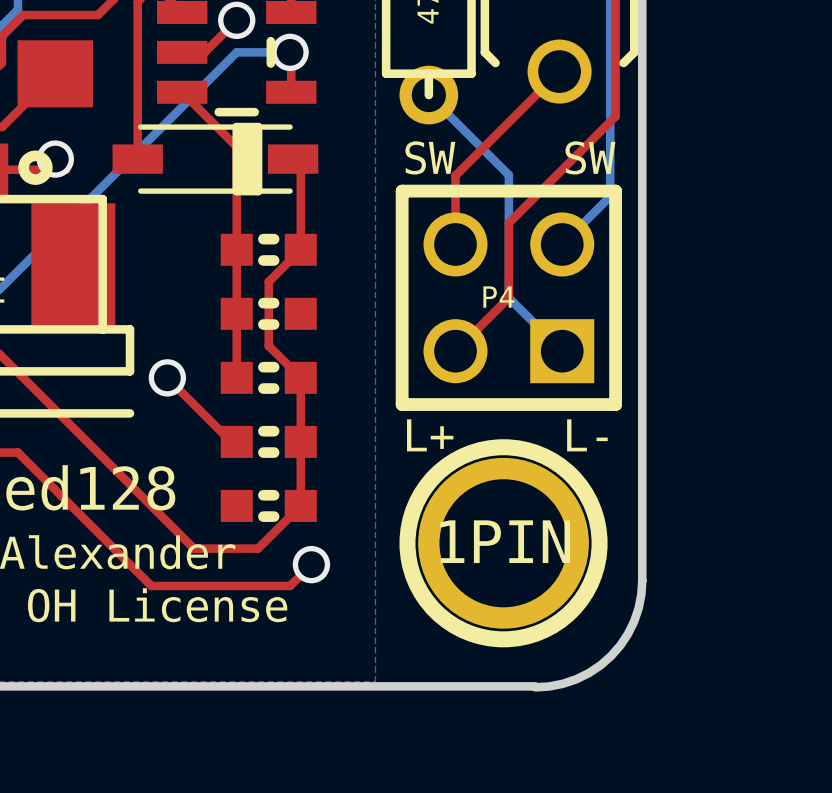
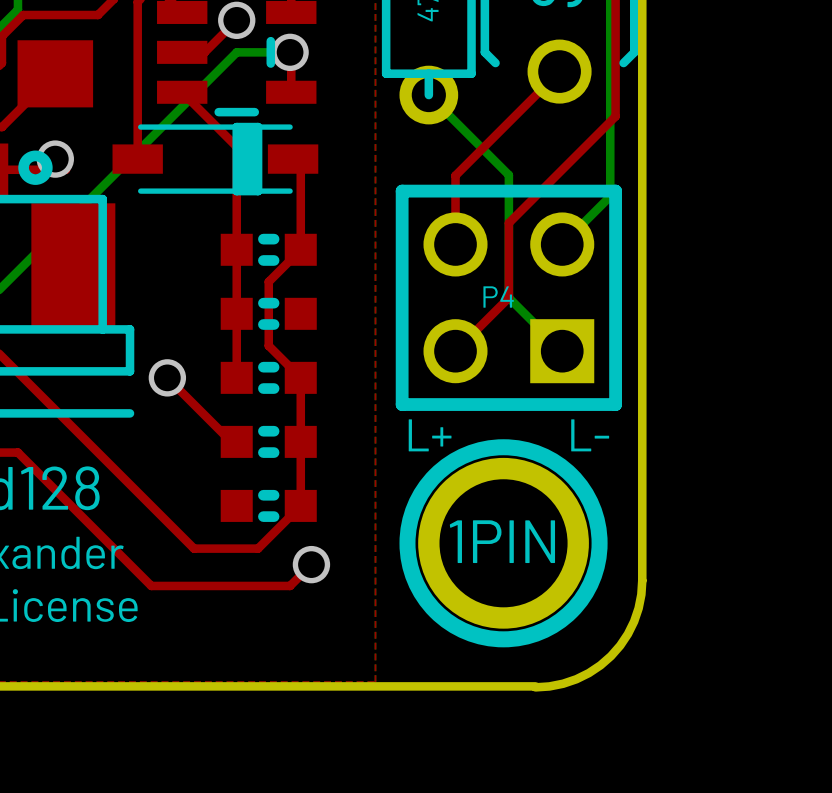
text: SW (430, 157) -> none
text: SW (590, 157) -> none

